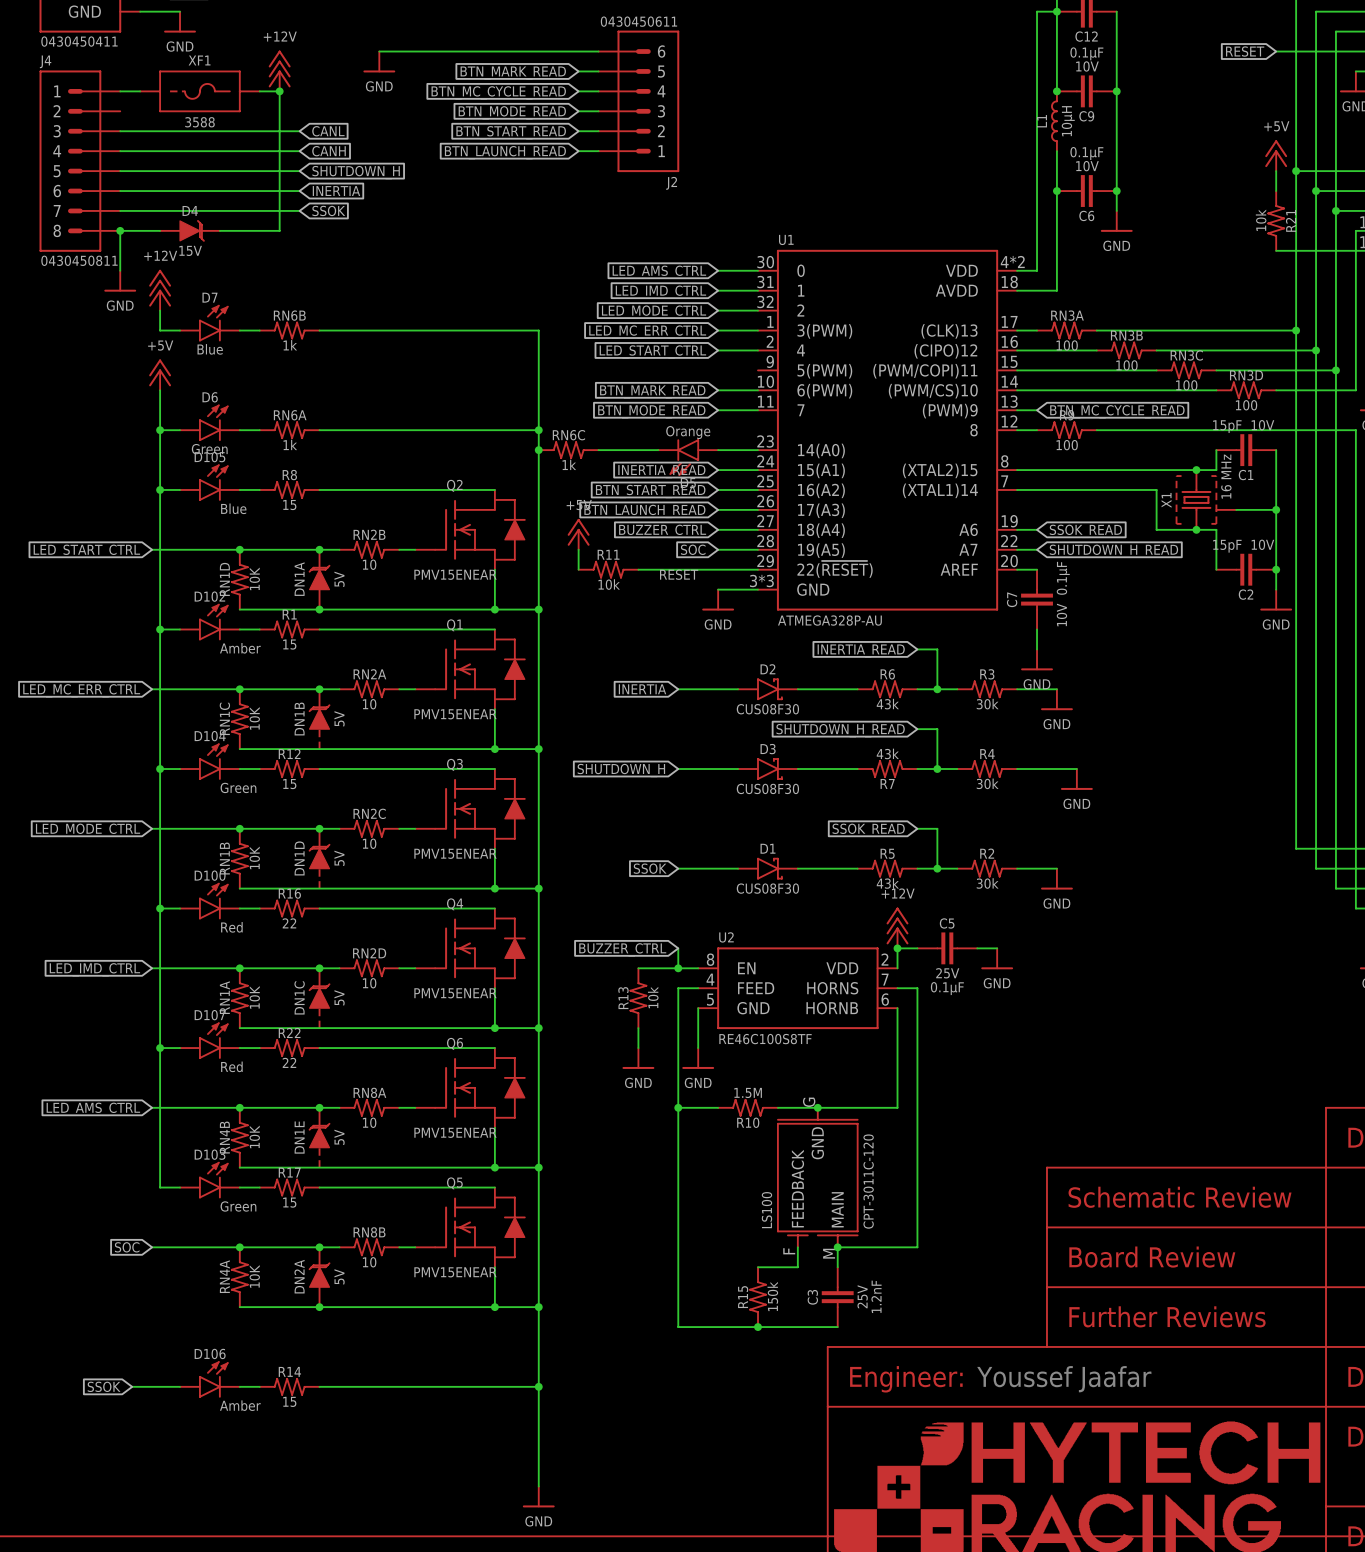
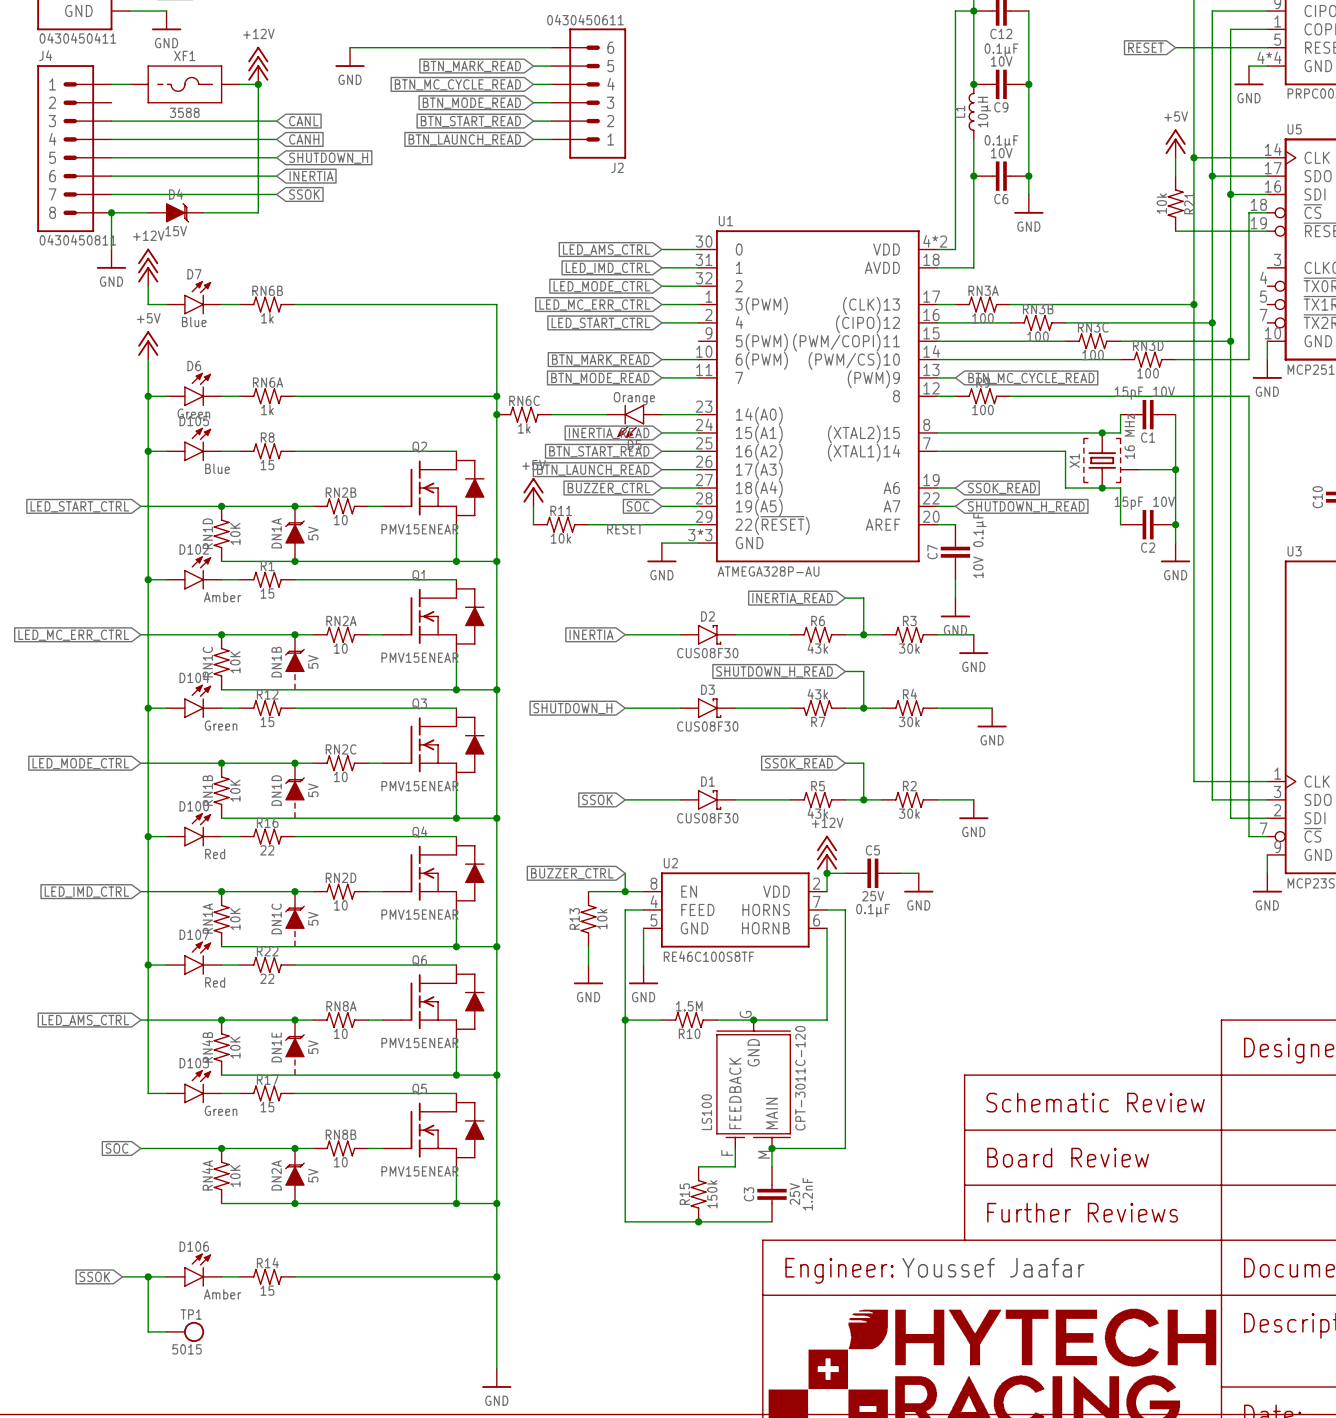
wire: none -> (148, 1276) (148, 1331) (166, 1331)
junction: none -> (148, 1276)
TP1: none -> (185, 1331)

